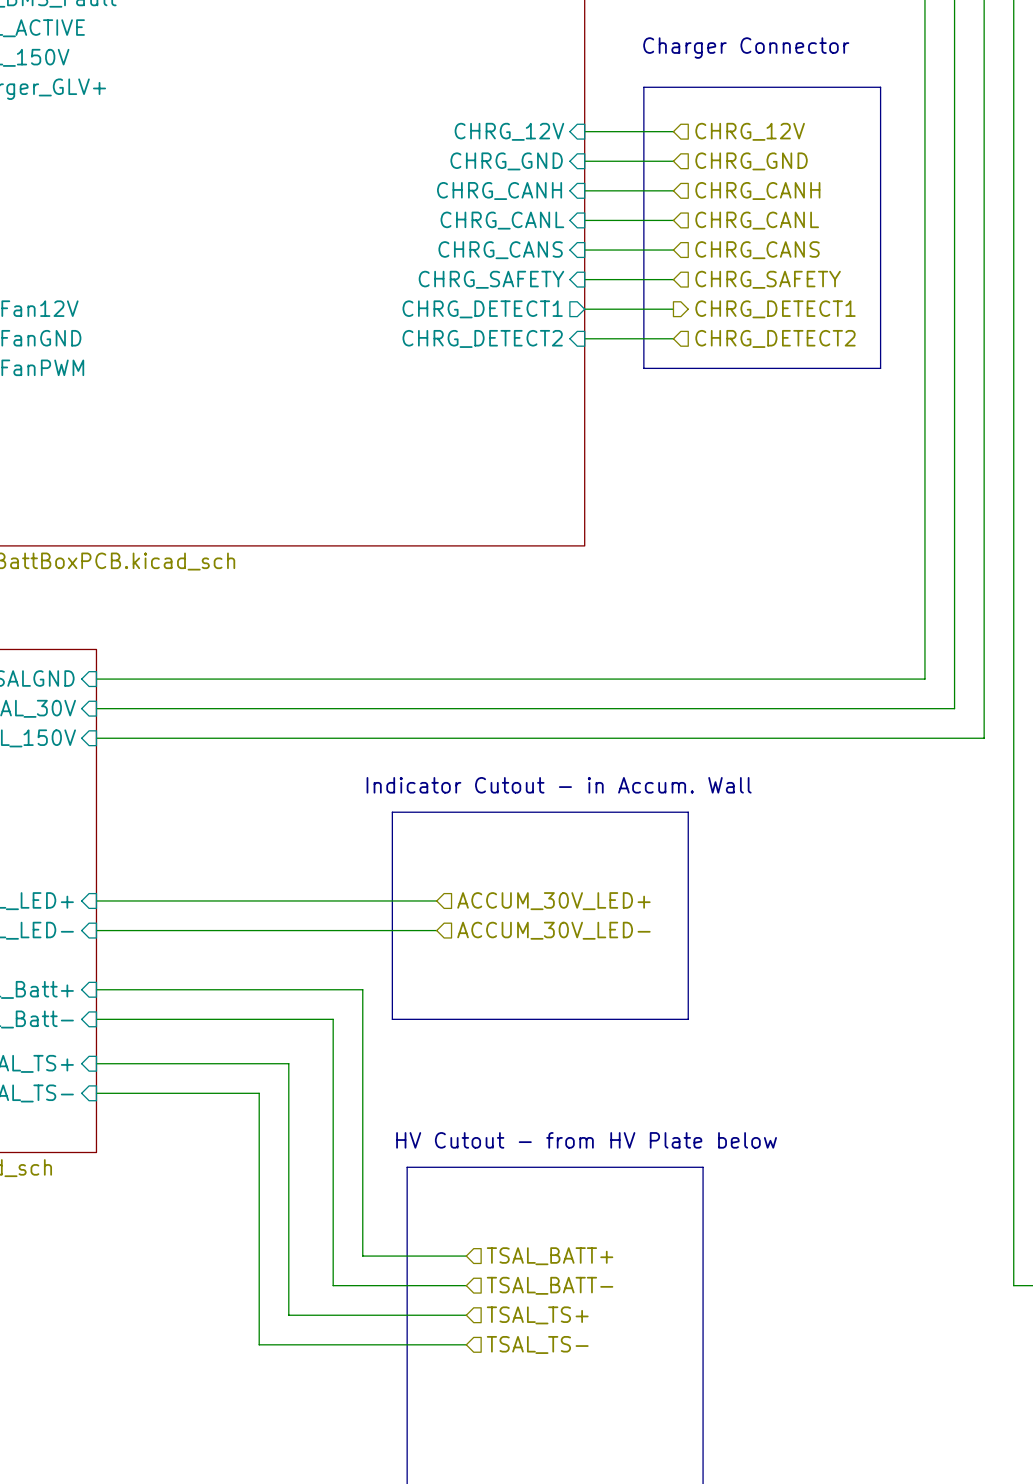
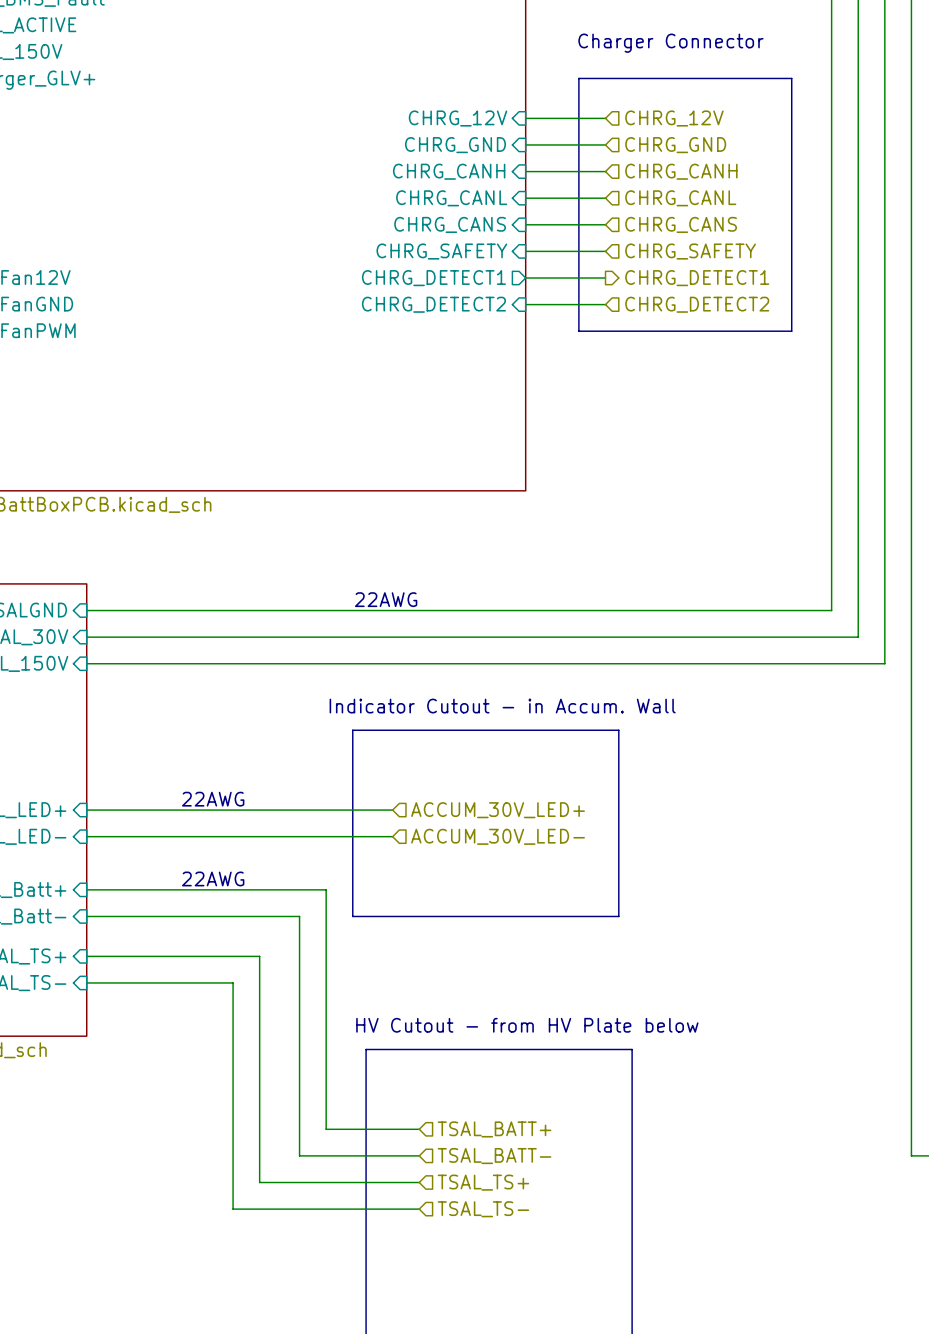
text: none -> 22AWG (386, 599)
text: none -> 22AWG (213, 799)
text: none -> 22AWG (213, 878)

